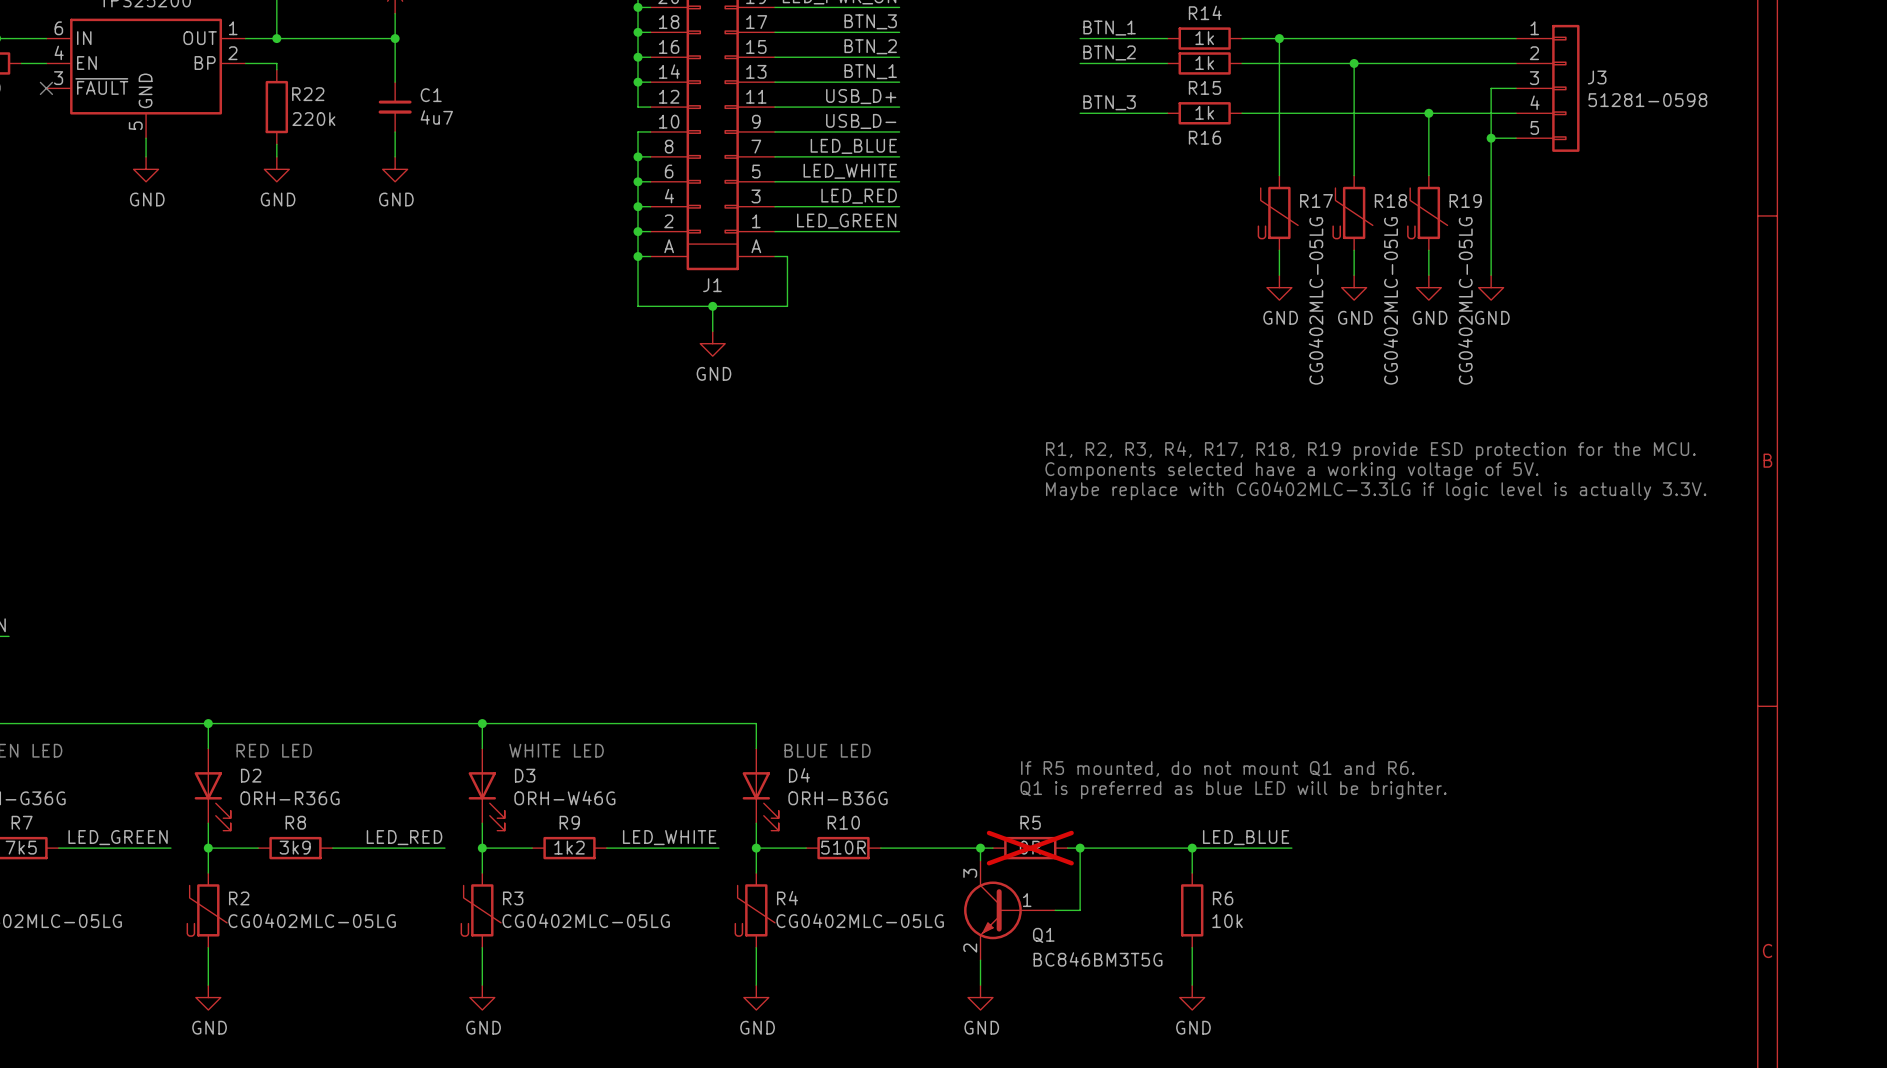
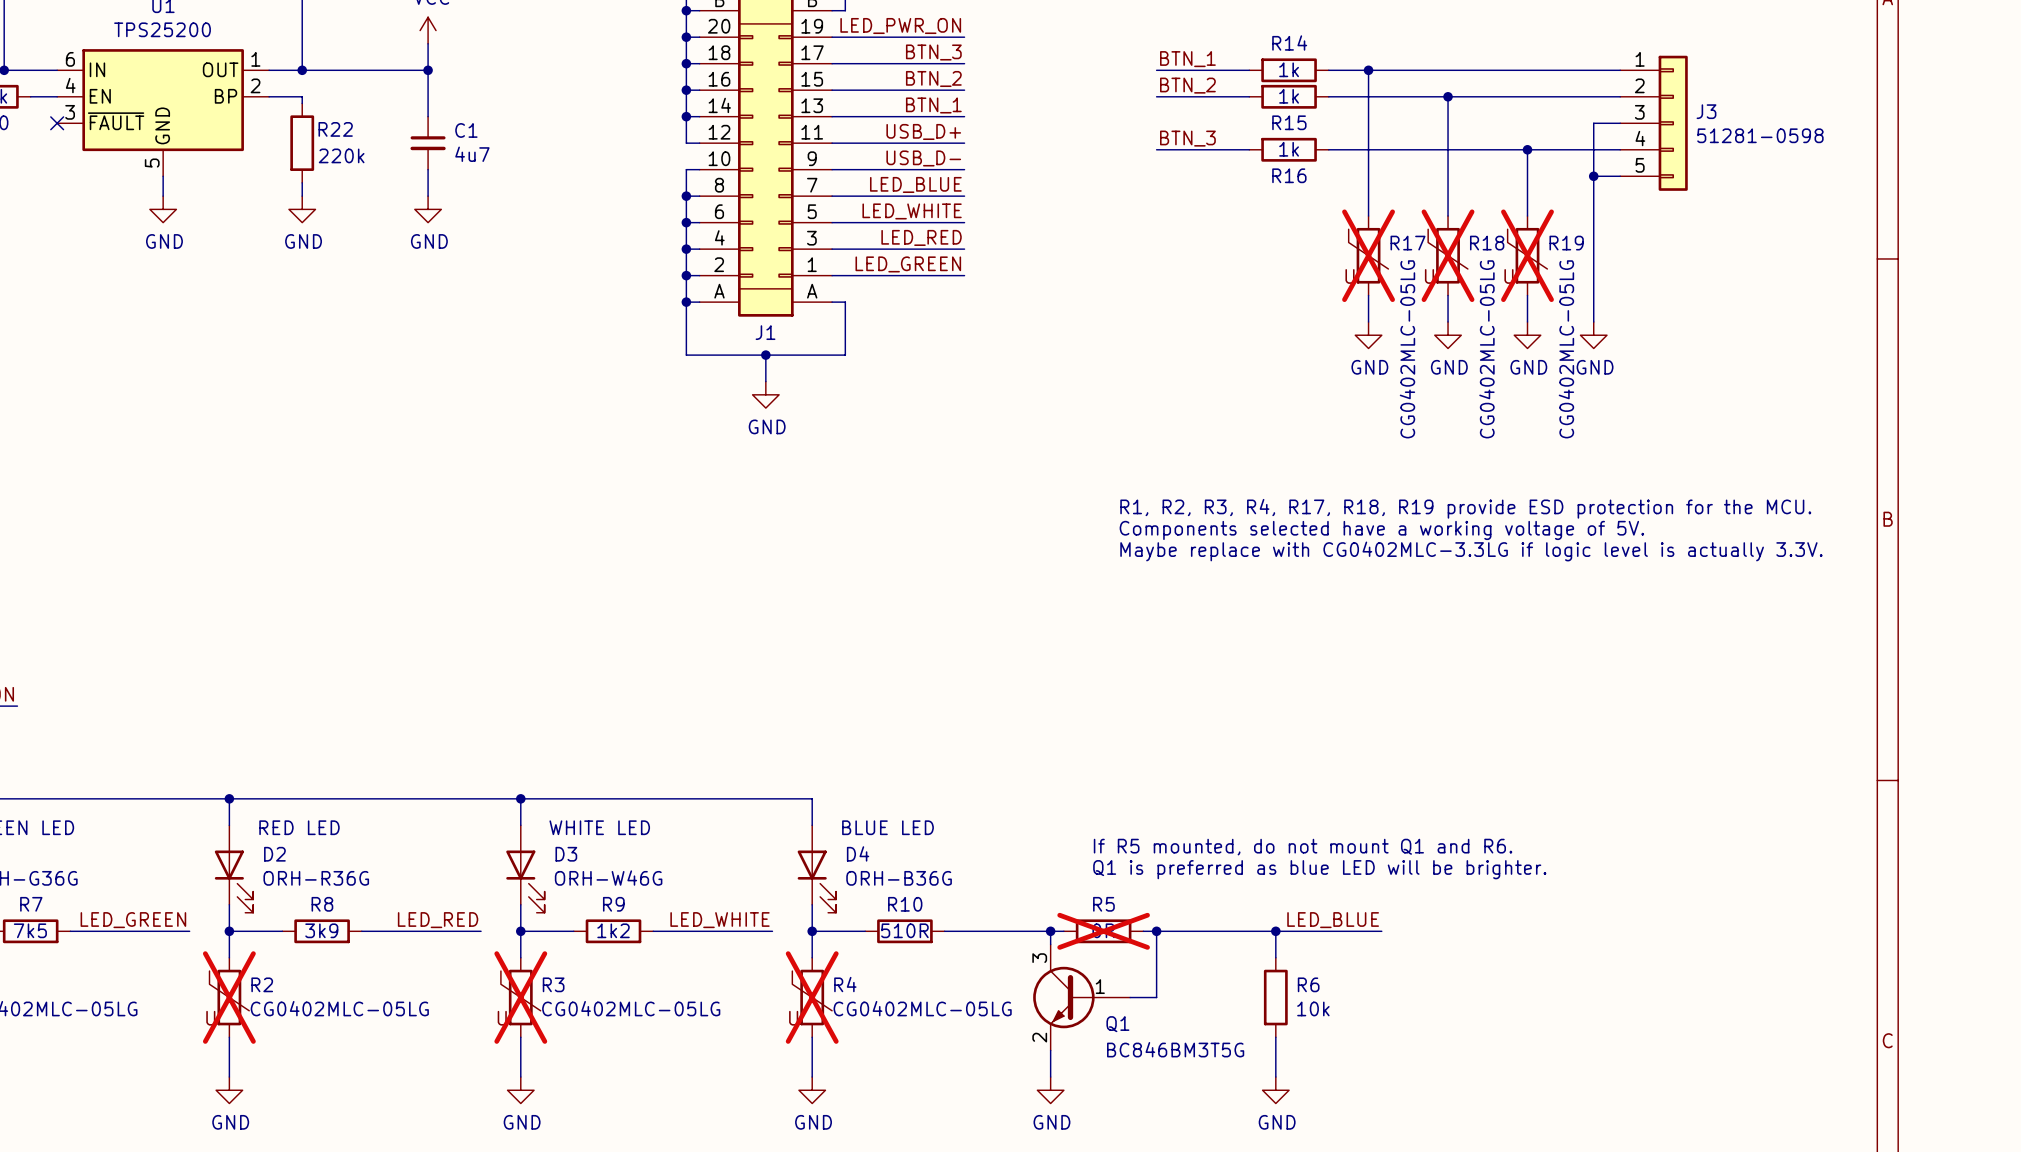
R17 do-not-place cross: none -> (1368, 255)
R18 do-not-place cross: none -> (1448, 255)
R19 do-not-place cross: none -> (1527, 255)
R2 do-not-place cross: none -> (229, 997)
R3 do-not-place cross: none -> (520, 997)
R4 do-not-place cross: none -> (812, 997)

